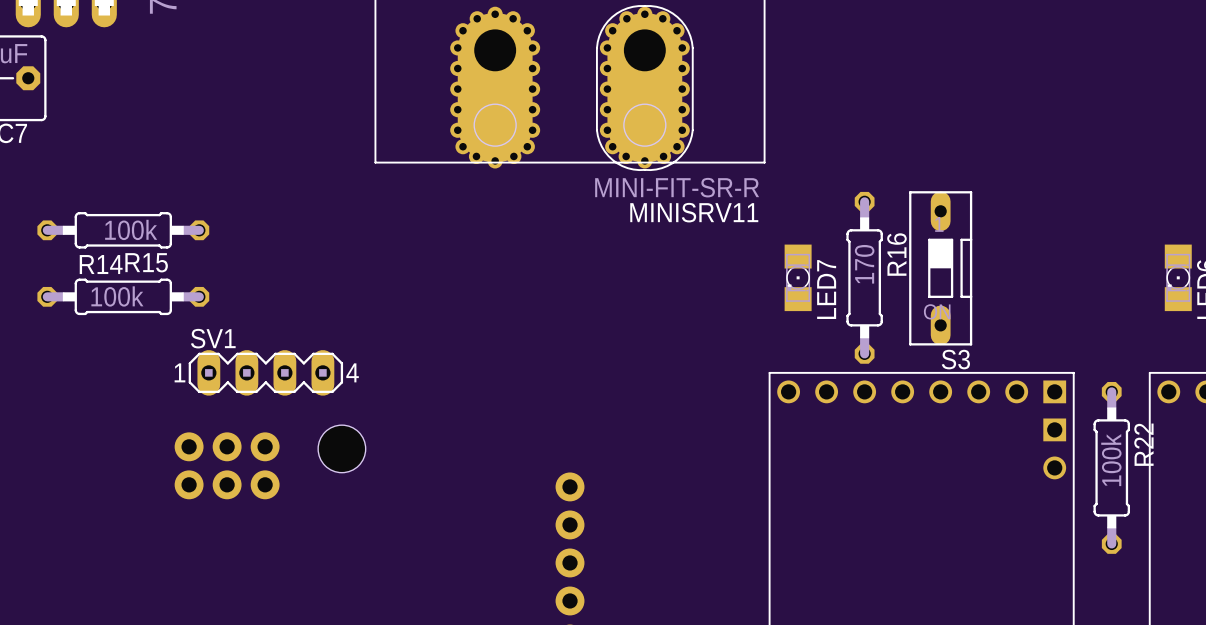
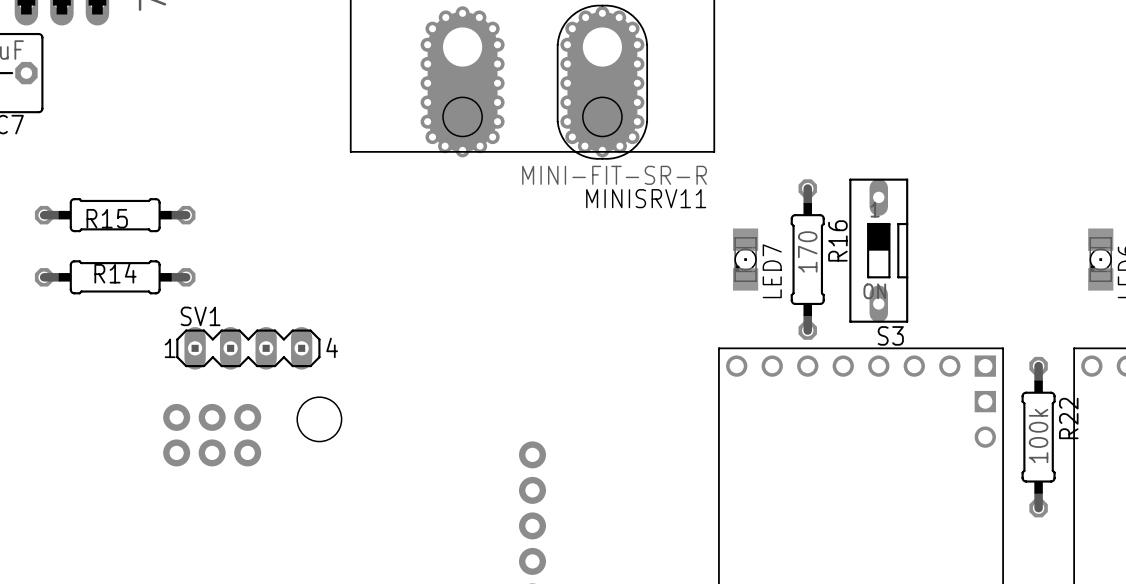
R15 value: 100k (131, 229) -> none
R15 name position: R15 (146, 262) -> R15 (107, 218)
R14 name position: R14 (101, 264) -> R14 (115, 273)
R14 value: 100k (117, 296) -> none

